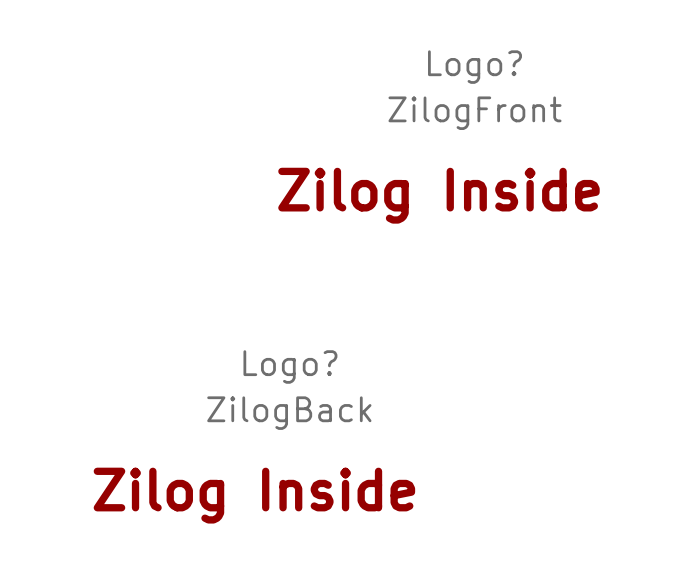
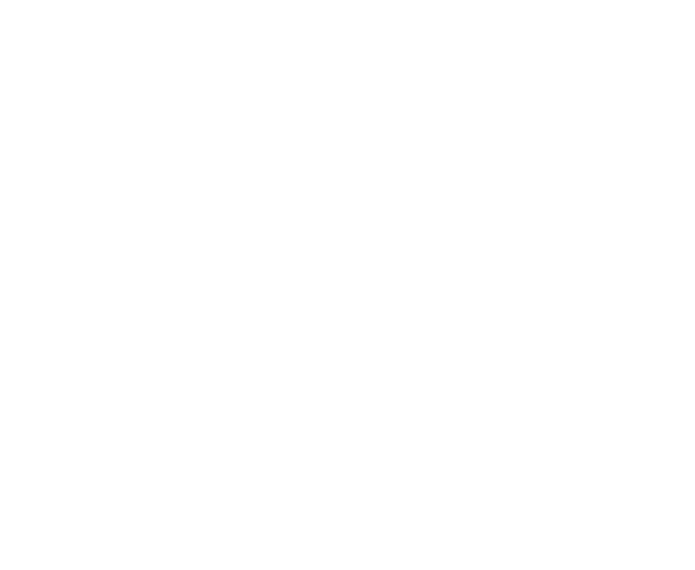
Logo?: ZilogFront (438, 136) -> none
Logo?: ZilogBack (254, 436) -> none

